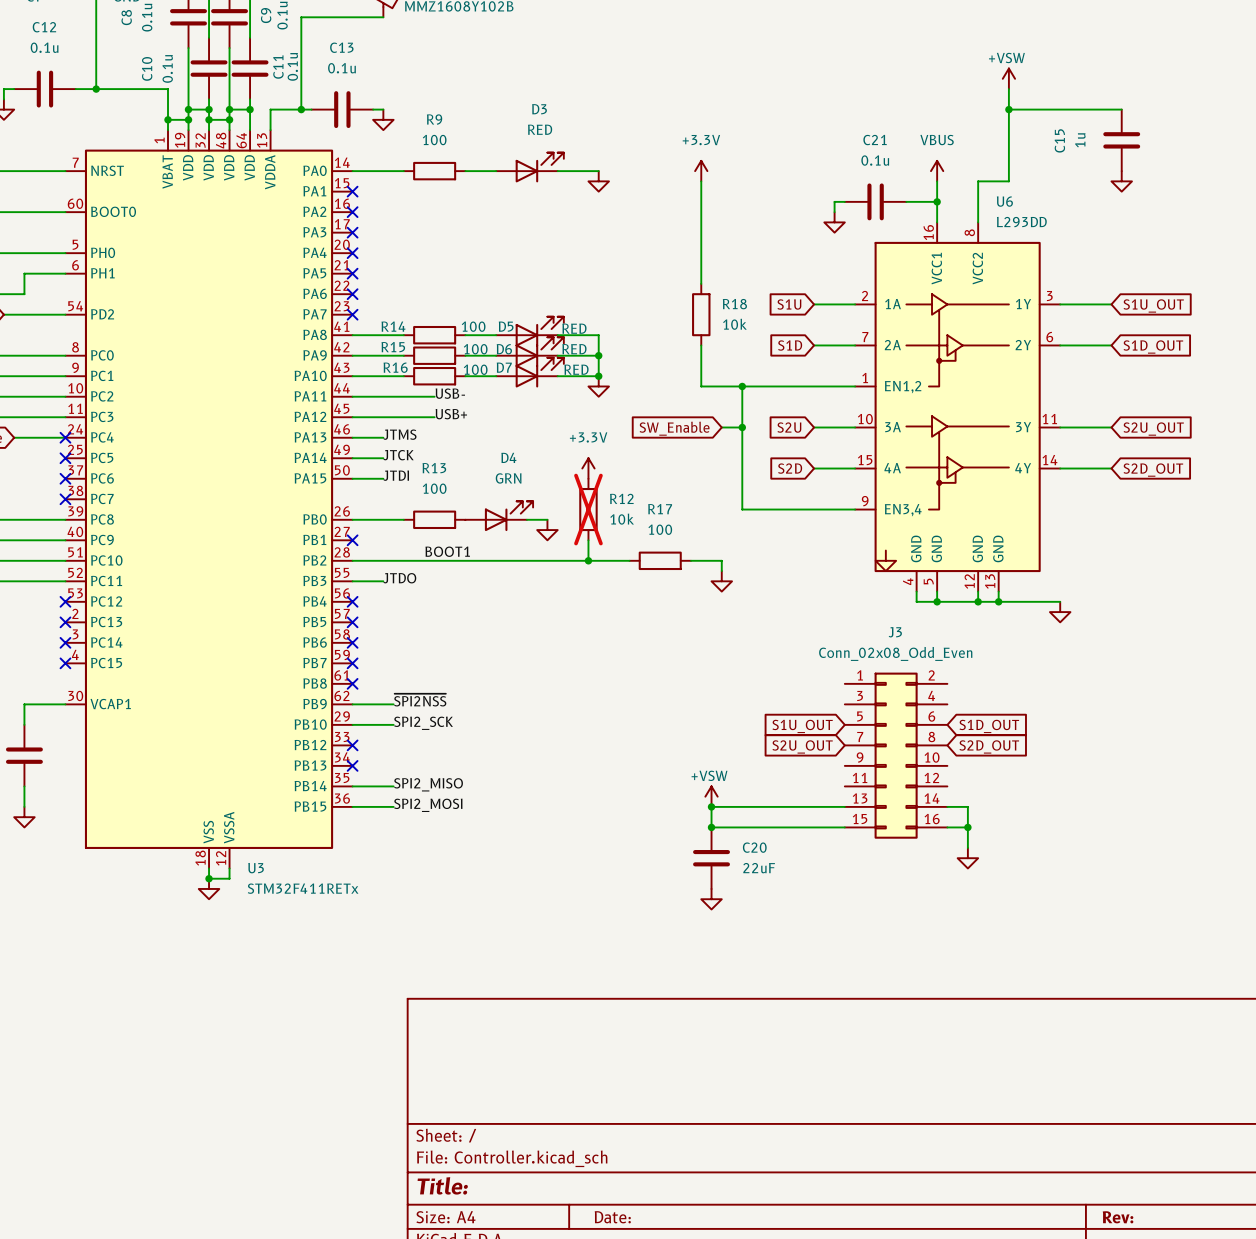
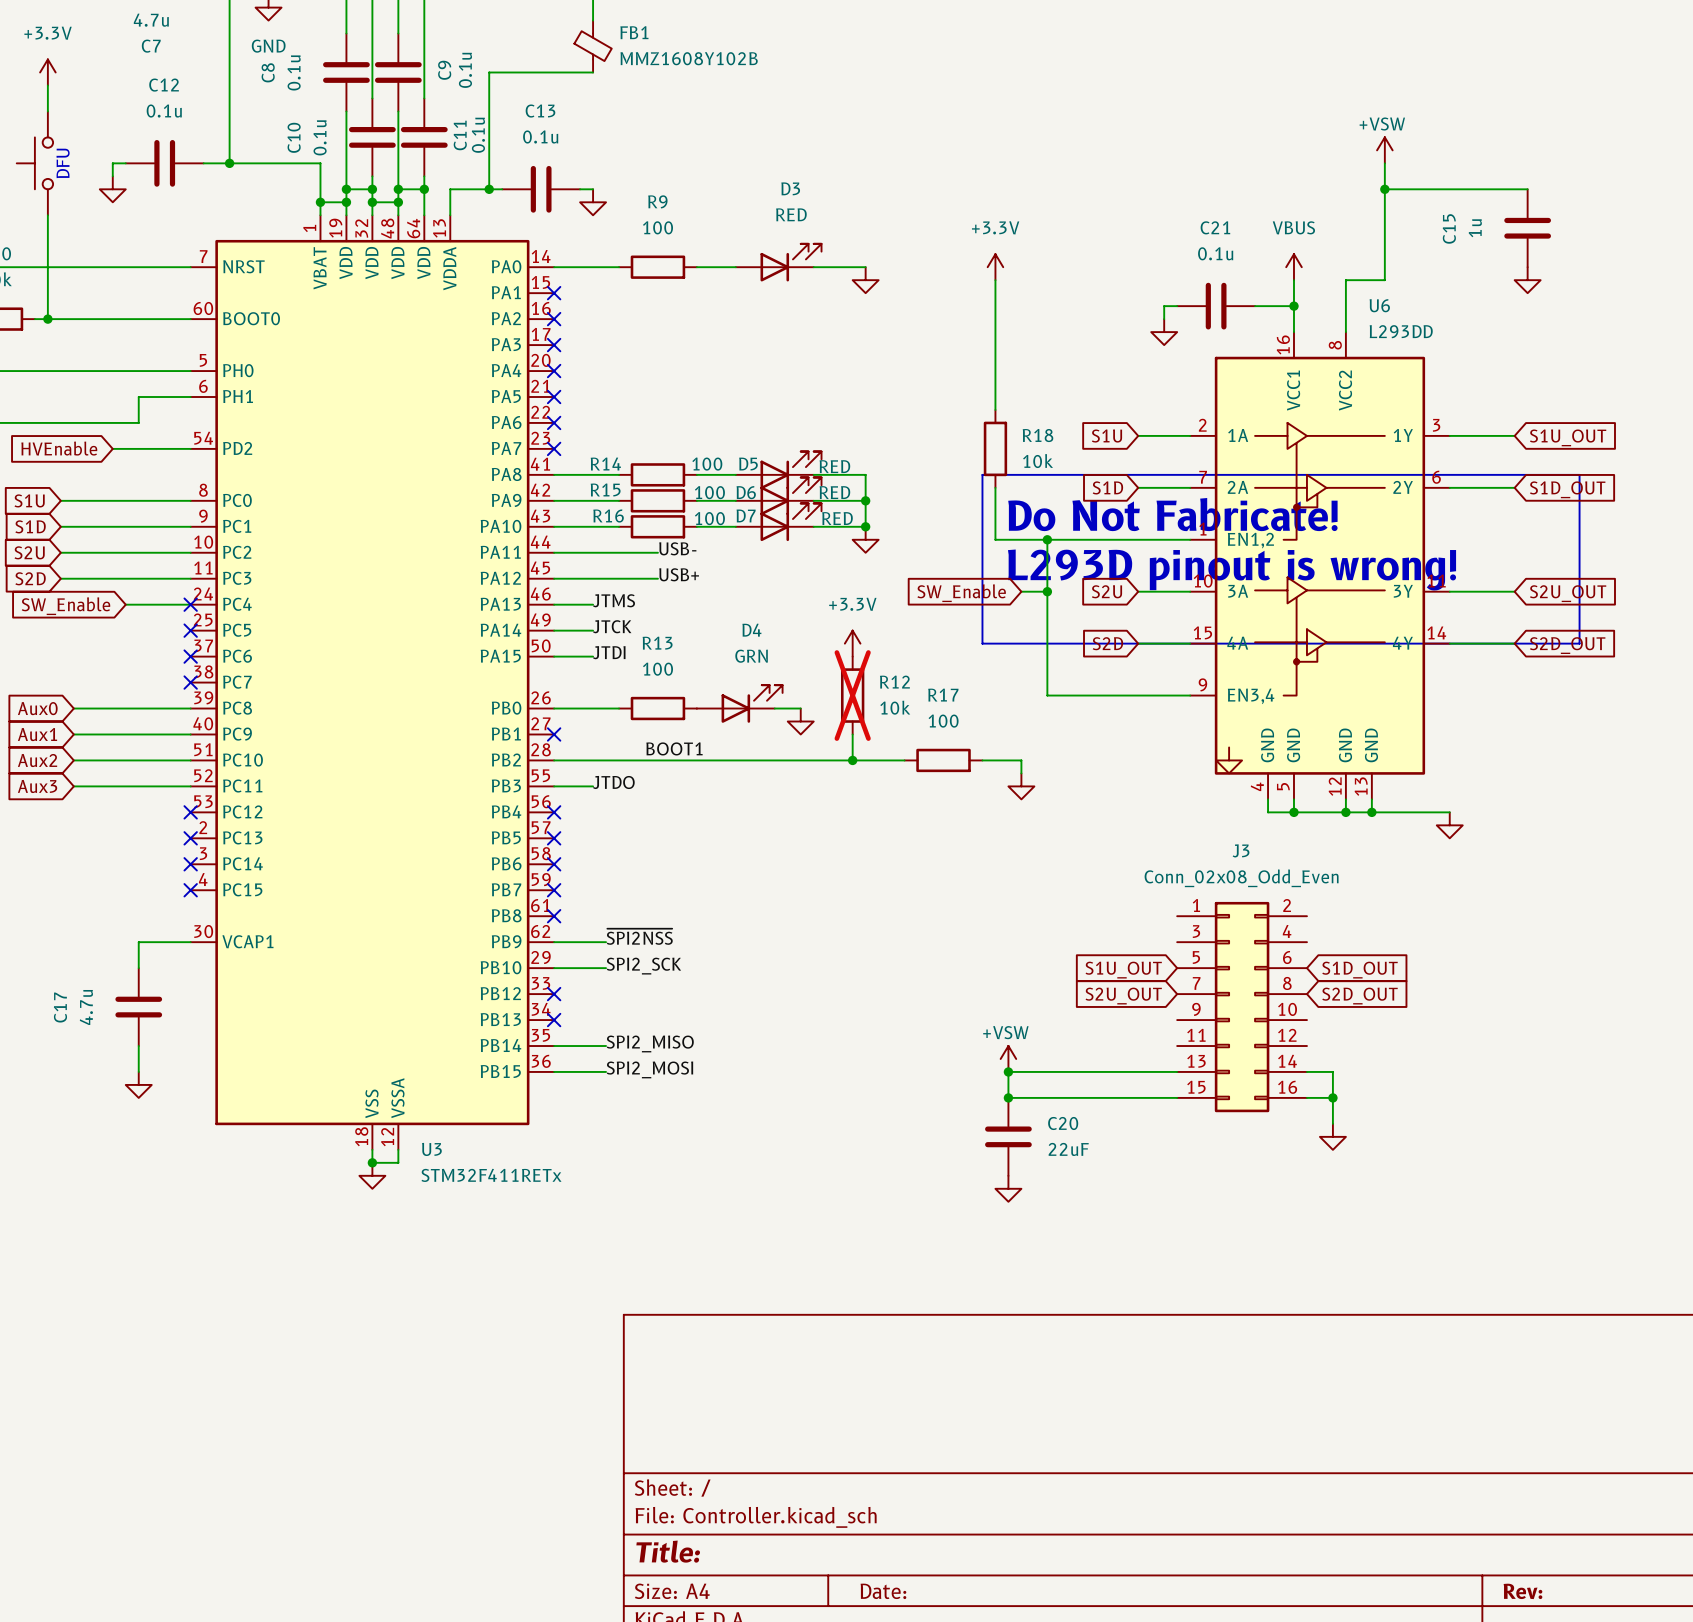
line: none -> (982, 474) (1579, 474) (1579, 643) (982, 643) (982, 474)
text: none -> Do Not Fabricate! (1172, 514)
text: none -> L293D pinout is wrong! (1232, 570)

